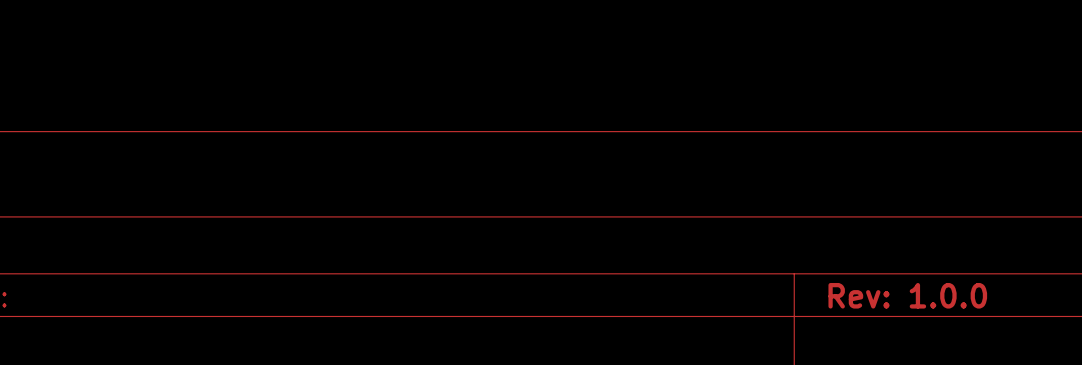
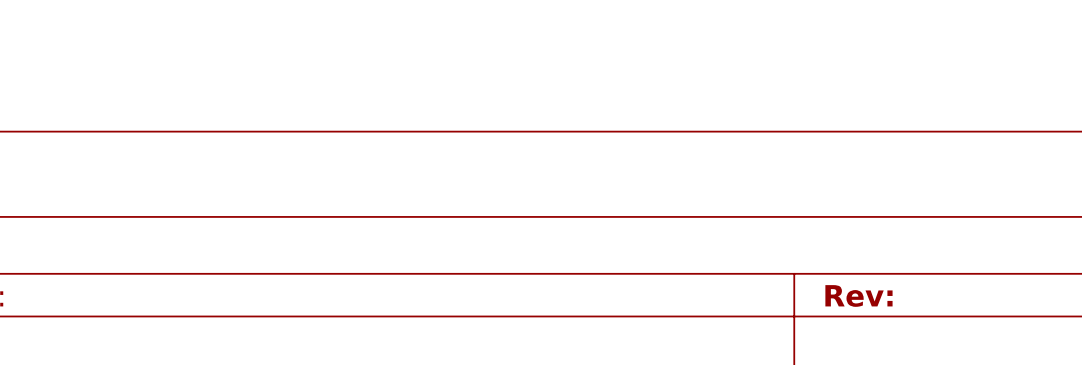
title block: Rev: 1.0.0 (907, 295) -> Rev: (858, 295)

